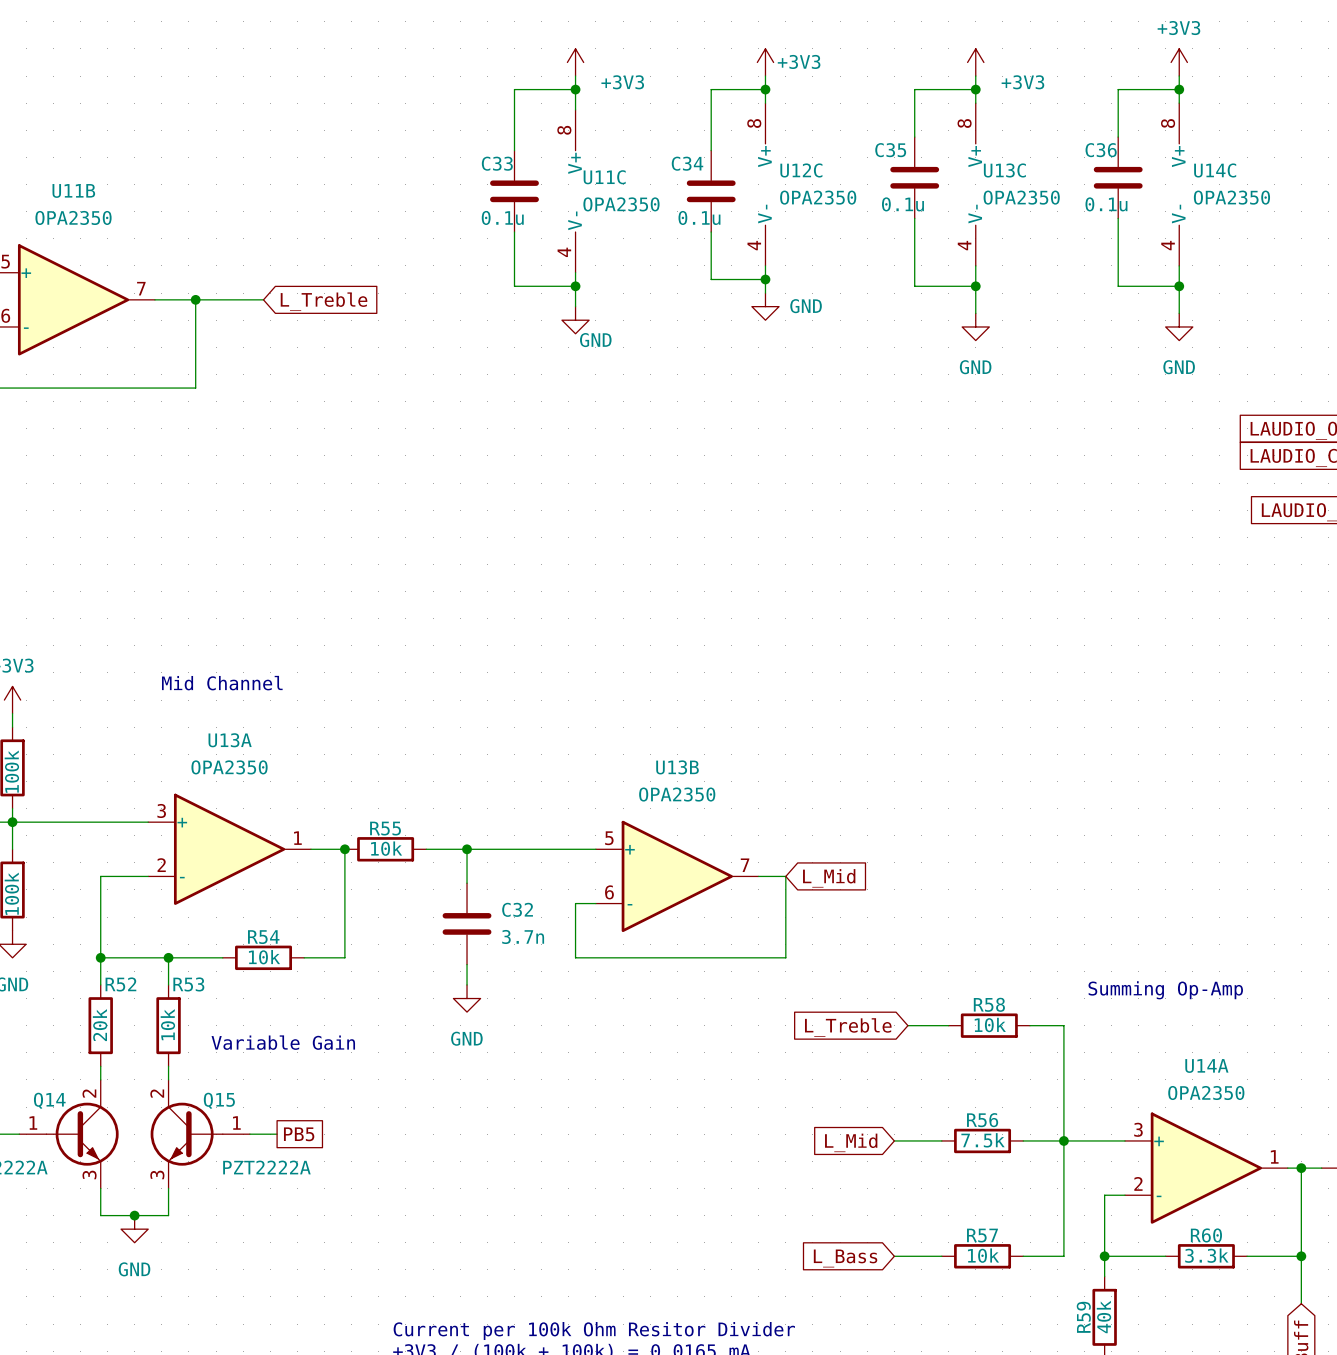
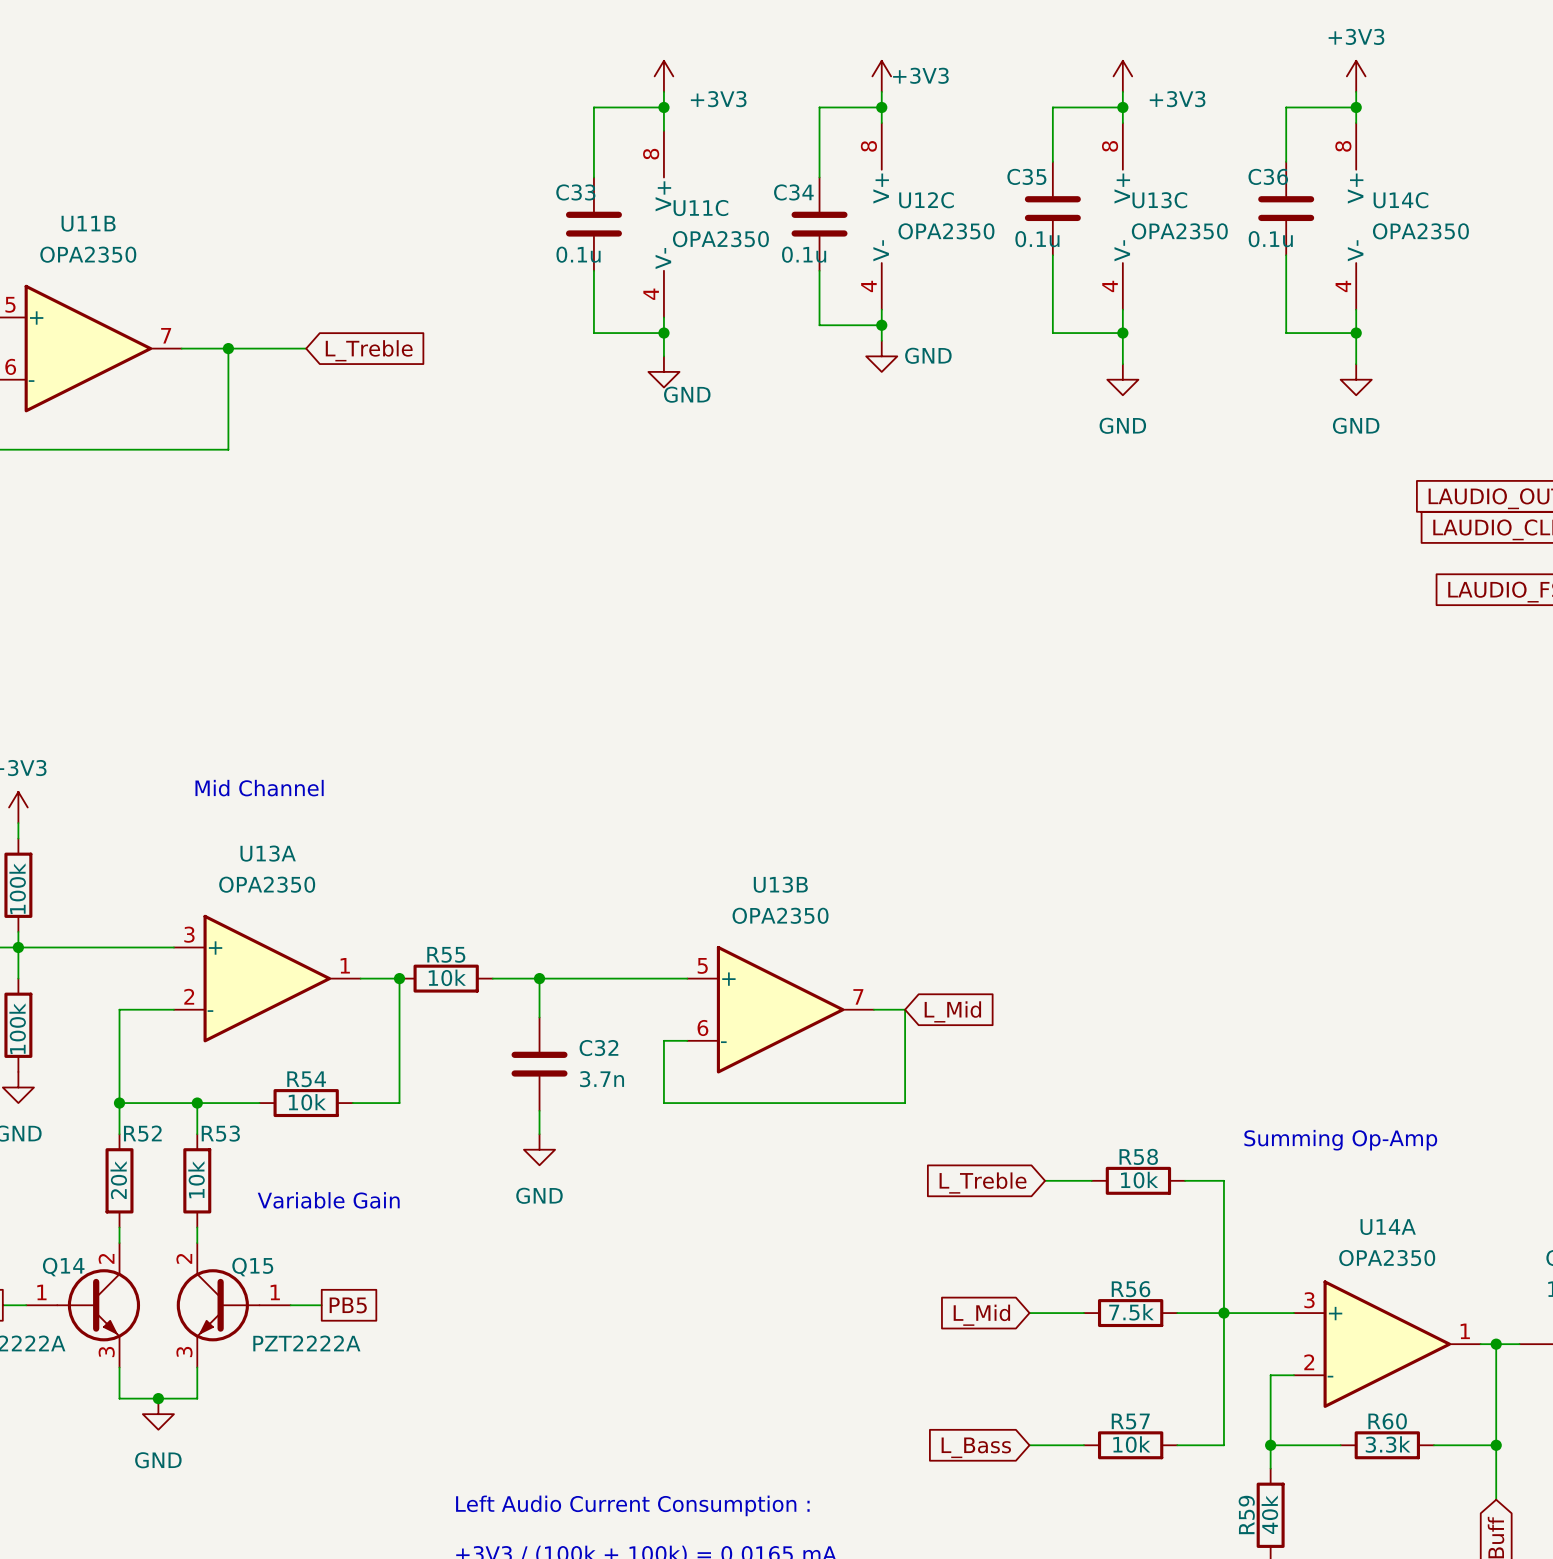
text: none -> Left Audio Current Consumption : (632, 1505)
text: Current per 100k Ohm Resitor Divider (594, 1331) -> none

